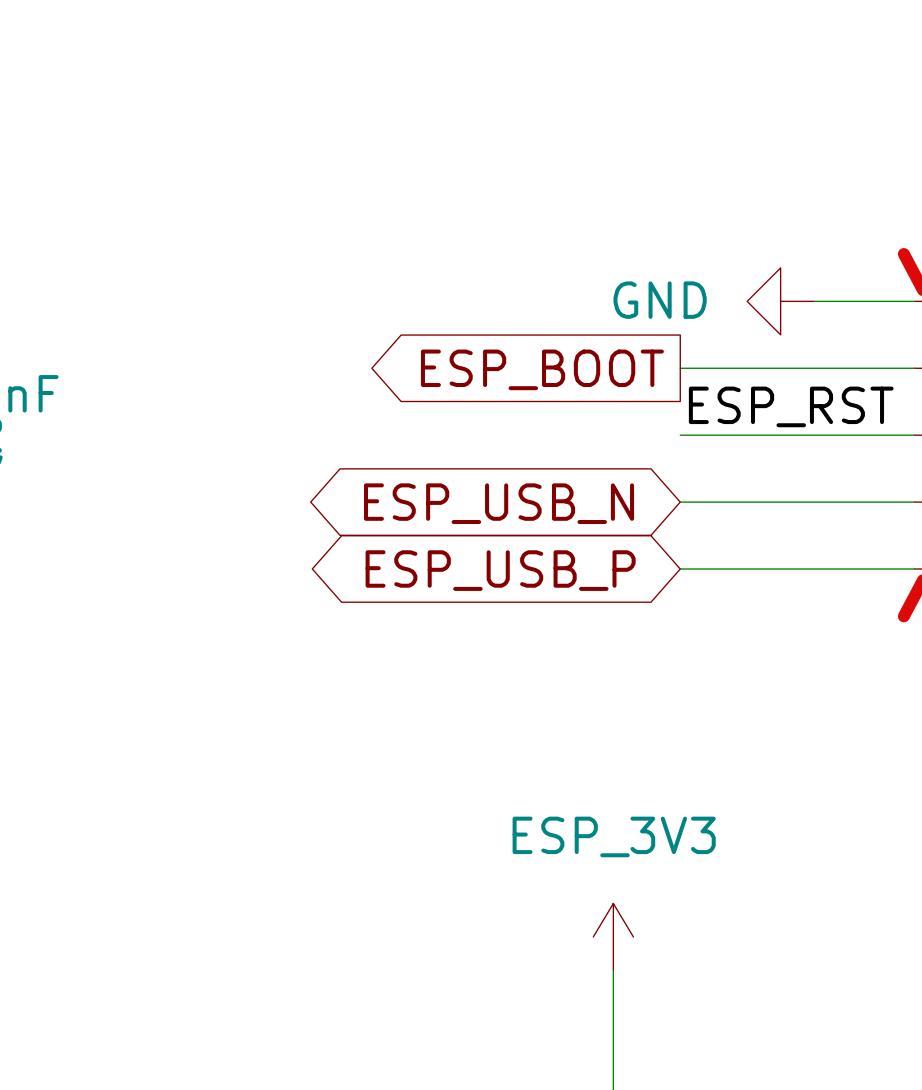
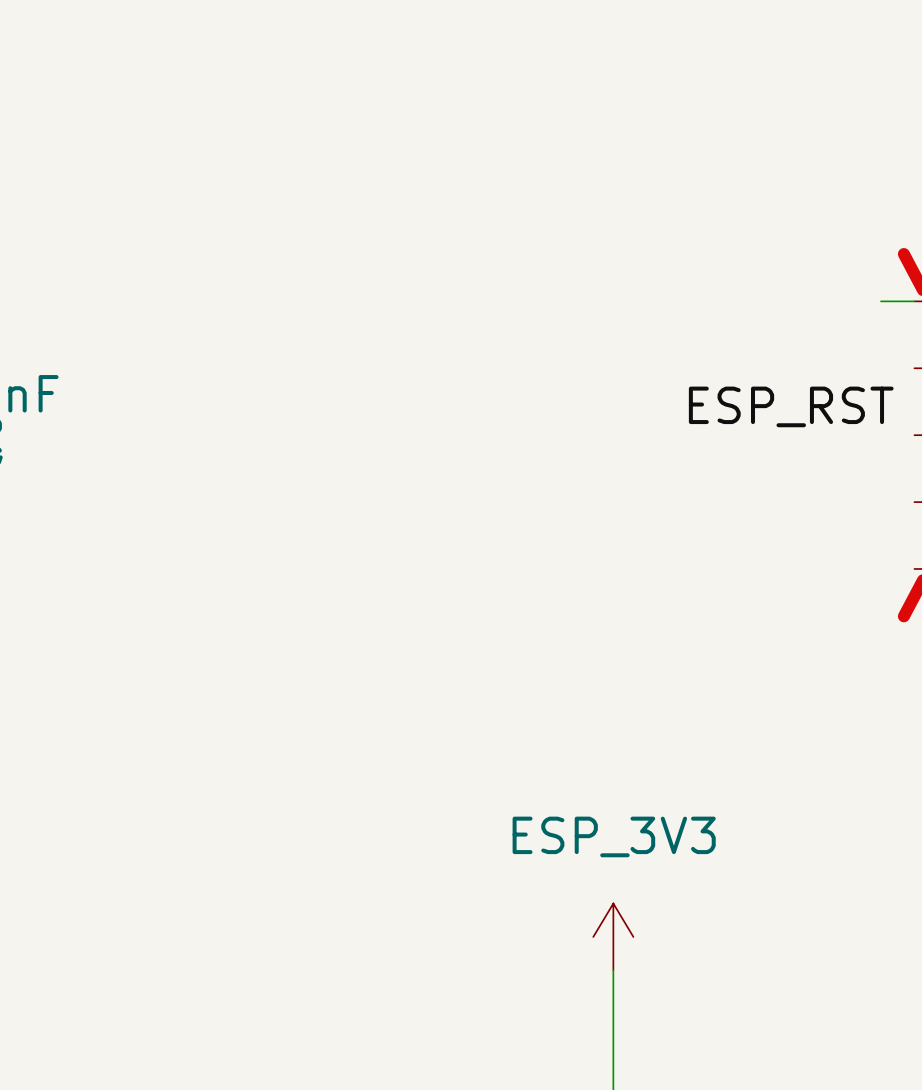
power symbol: GND (780, 301) -> none
wire: (814, 301) (880, 301) -> none
wire: (680, 368) (914, 368) -> none
global label: ESP_BOOT (542, 369) -> none
wire: (680, 435) (914, 435) -> none
wire: (680, 502) (914, 502) -> none
global label: ESP_USB_N (499, 503) -> none
wire: (680, 568) (914, 568) -> none
global label: ESP_USB_P (500, 570) -> none

